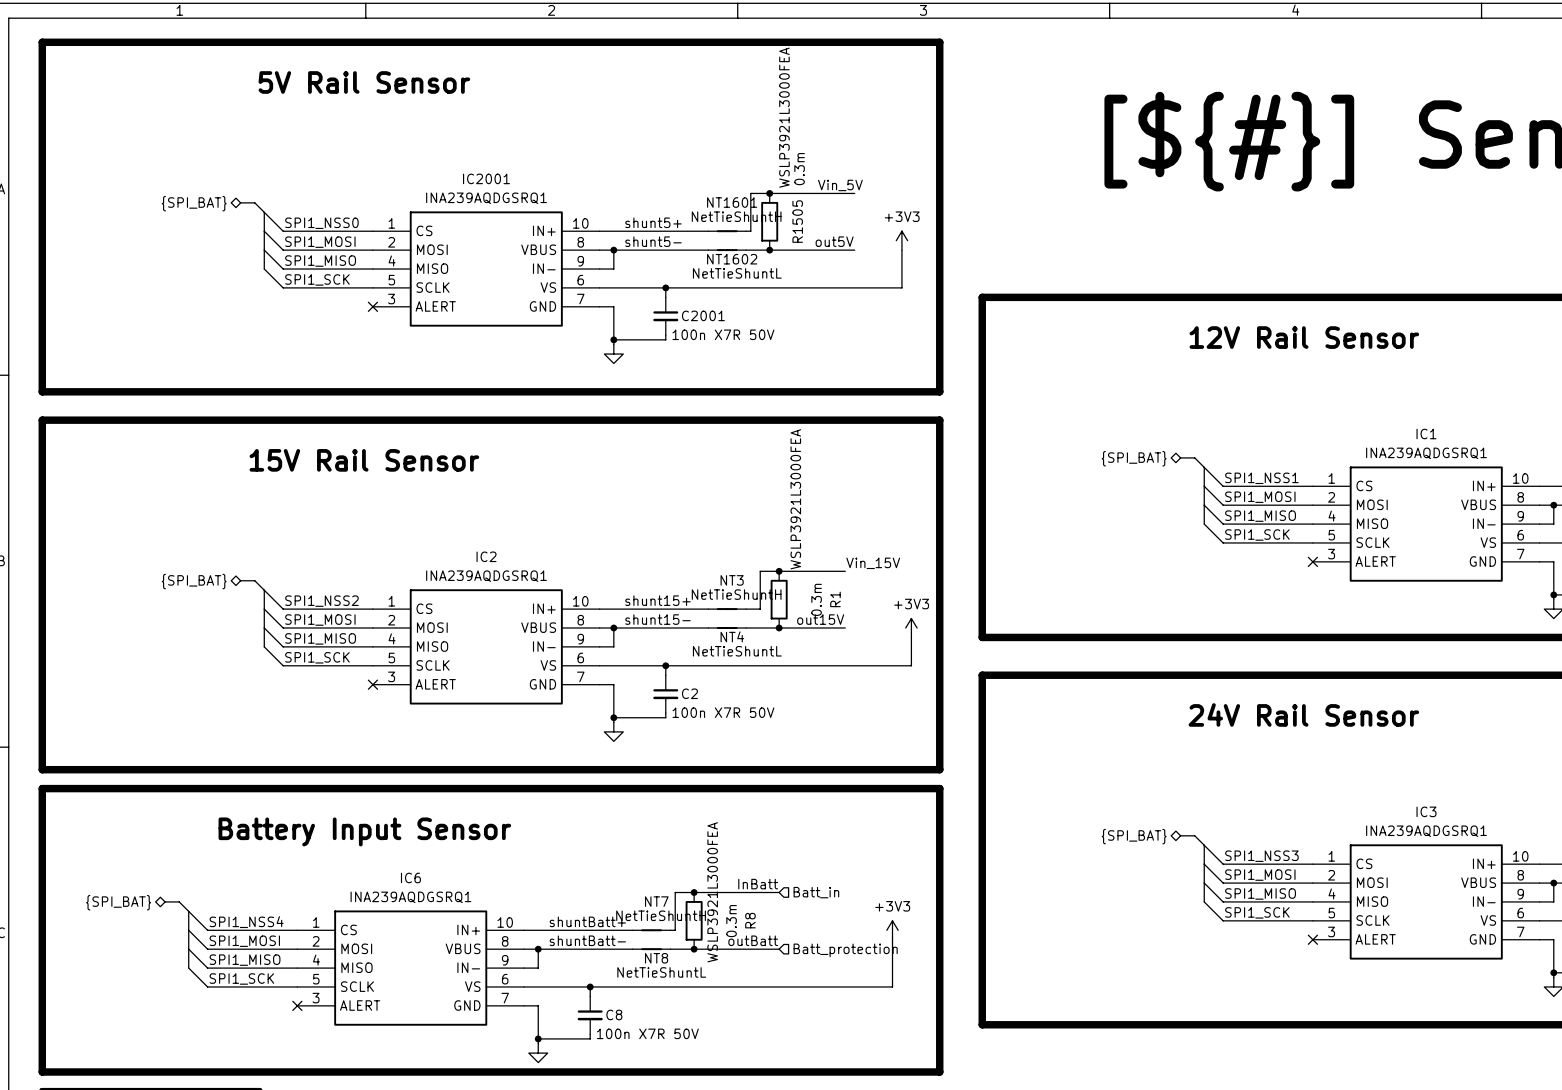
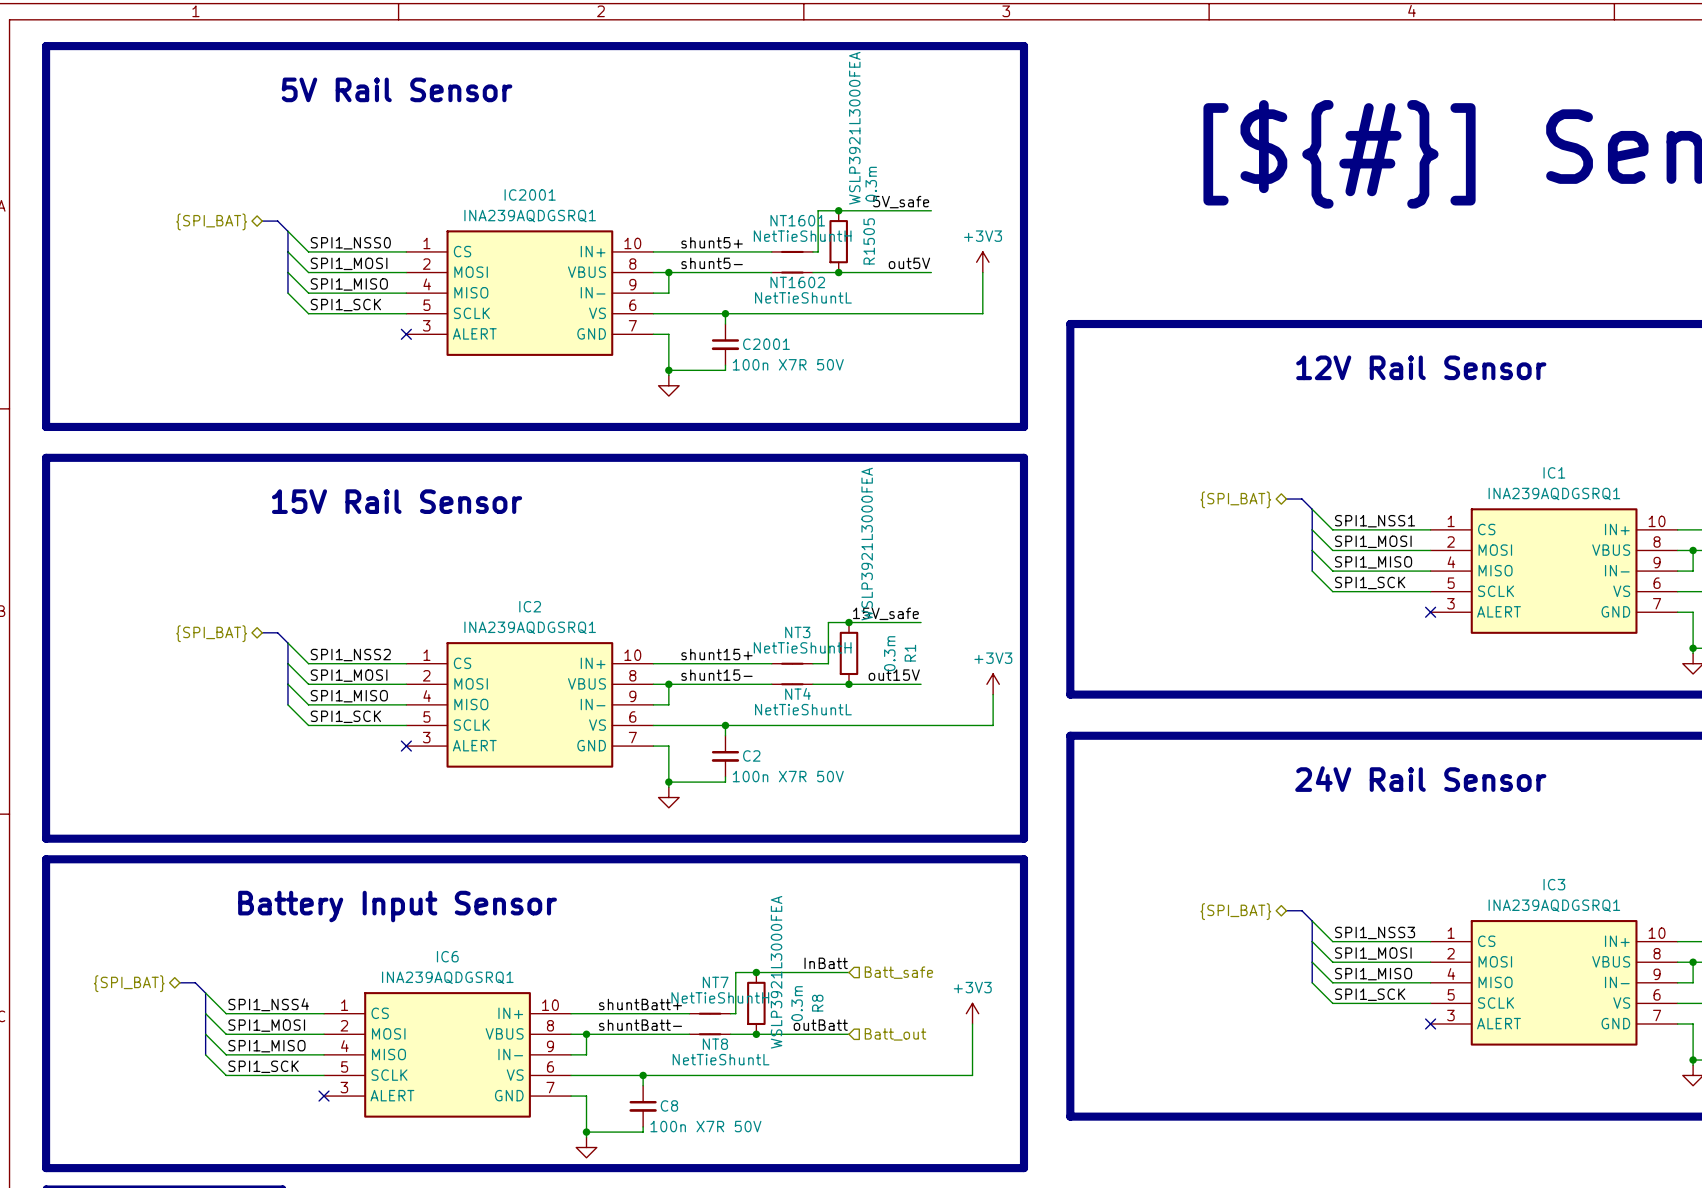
label: none -> 5V_safe (901, 202)
label: Vin_5V (840, 185) -> none
label: Vin_15V (873, 563) -> 15V_safe (885, 613)
hierarchical label: Batt_in (816, 892) -> Batt_safe (898, 972)
hierarchical label: Batt_protection (845, 950) -> Batt_out (895, 1034)

